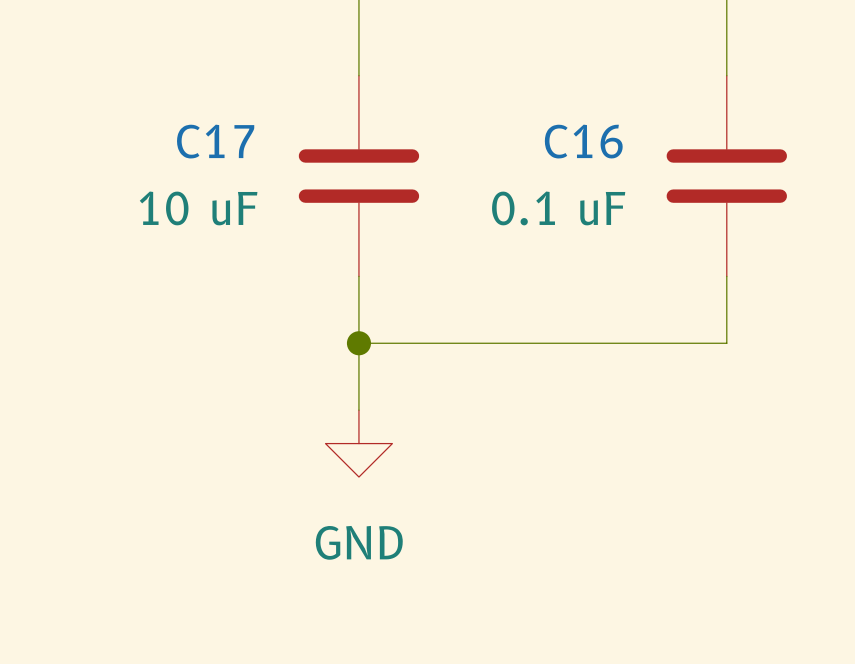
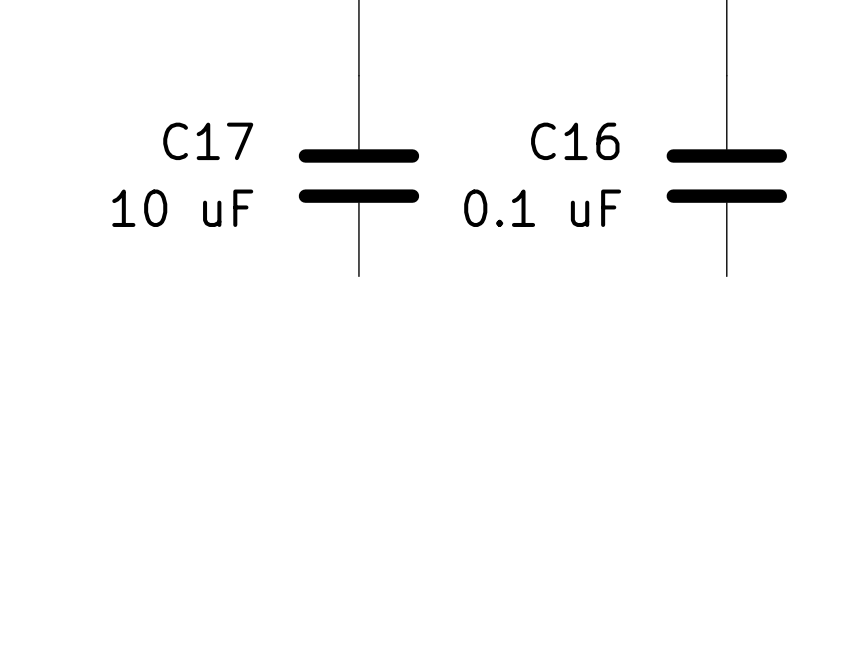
wire: (358, 276) (358, 410) -> none
wire: (726, 276) (726, 343) (358, 343) -> none
junction: (358, 343) -> none
power symbol: GND (358, 443) -> none

